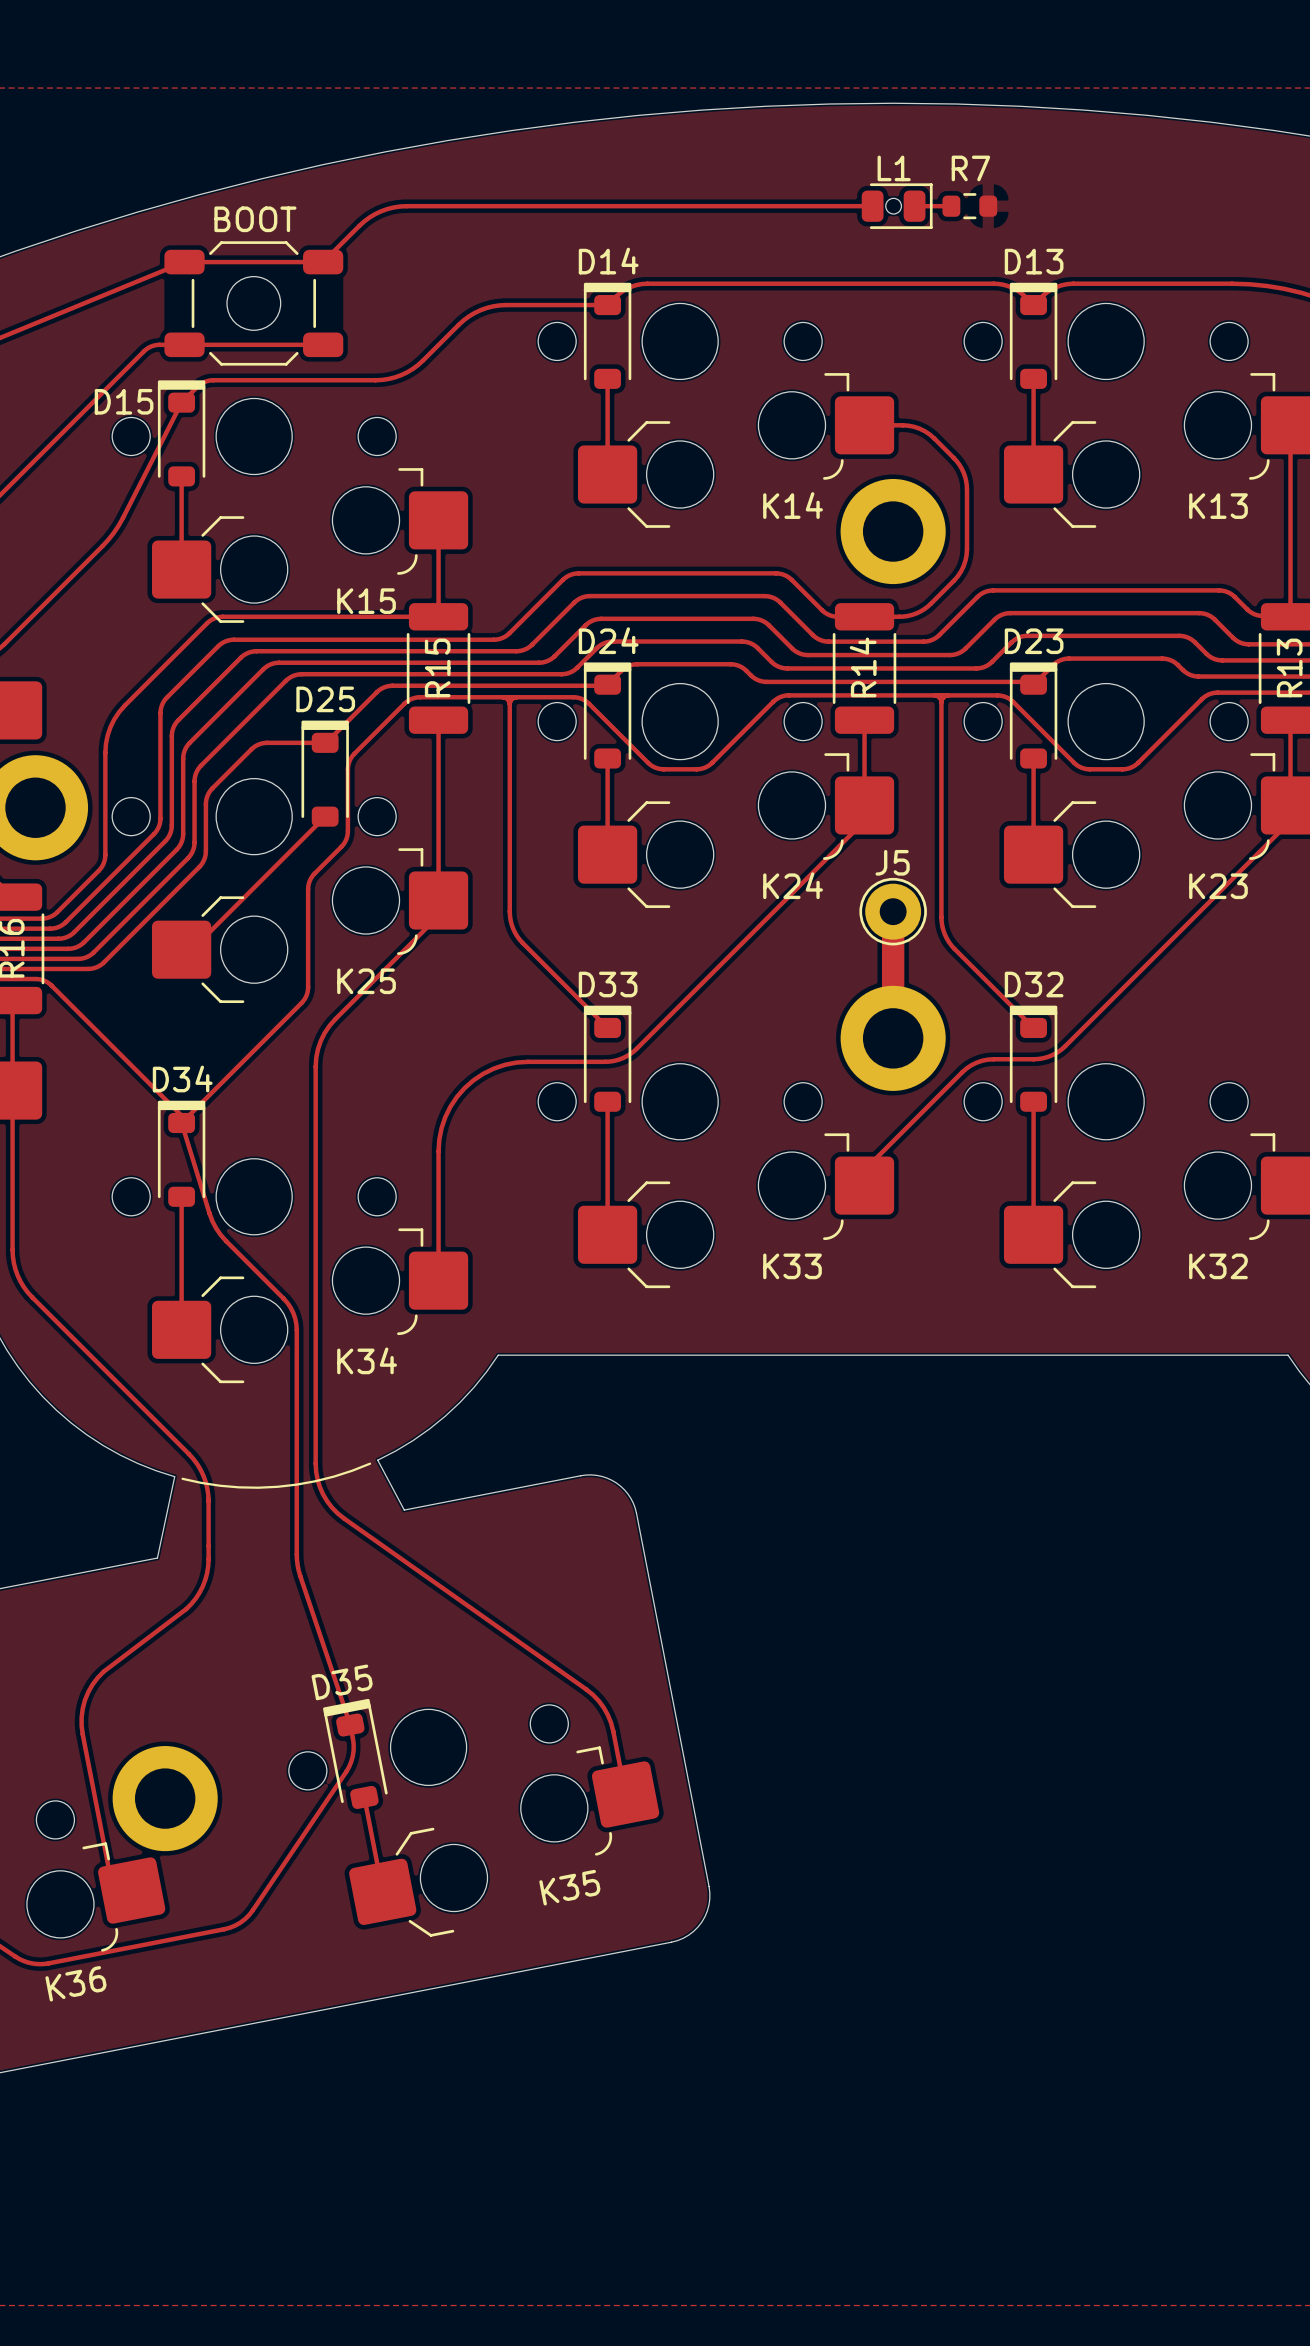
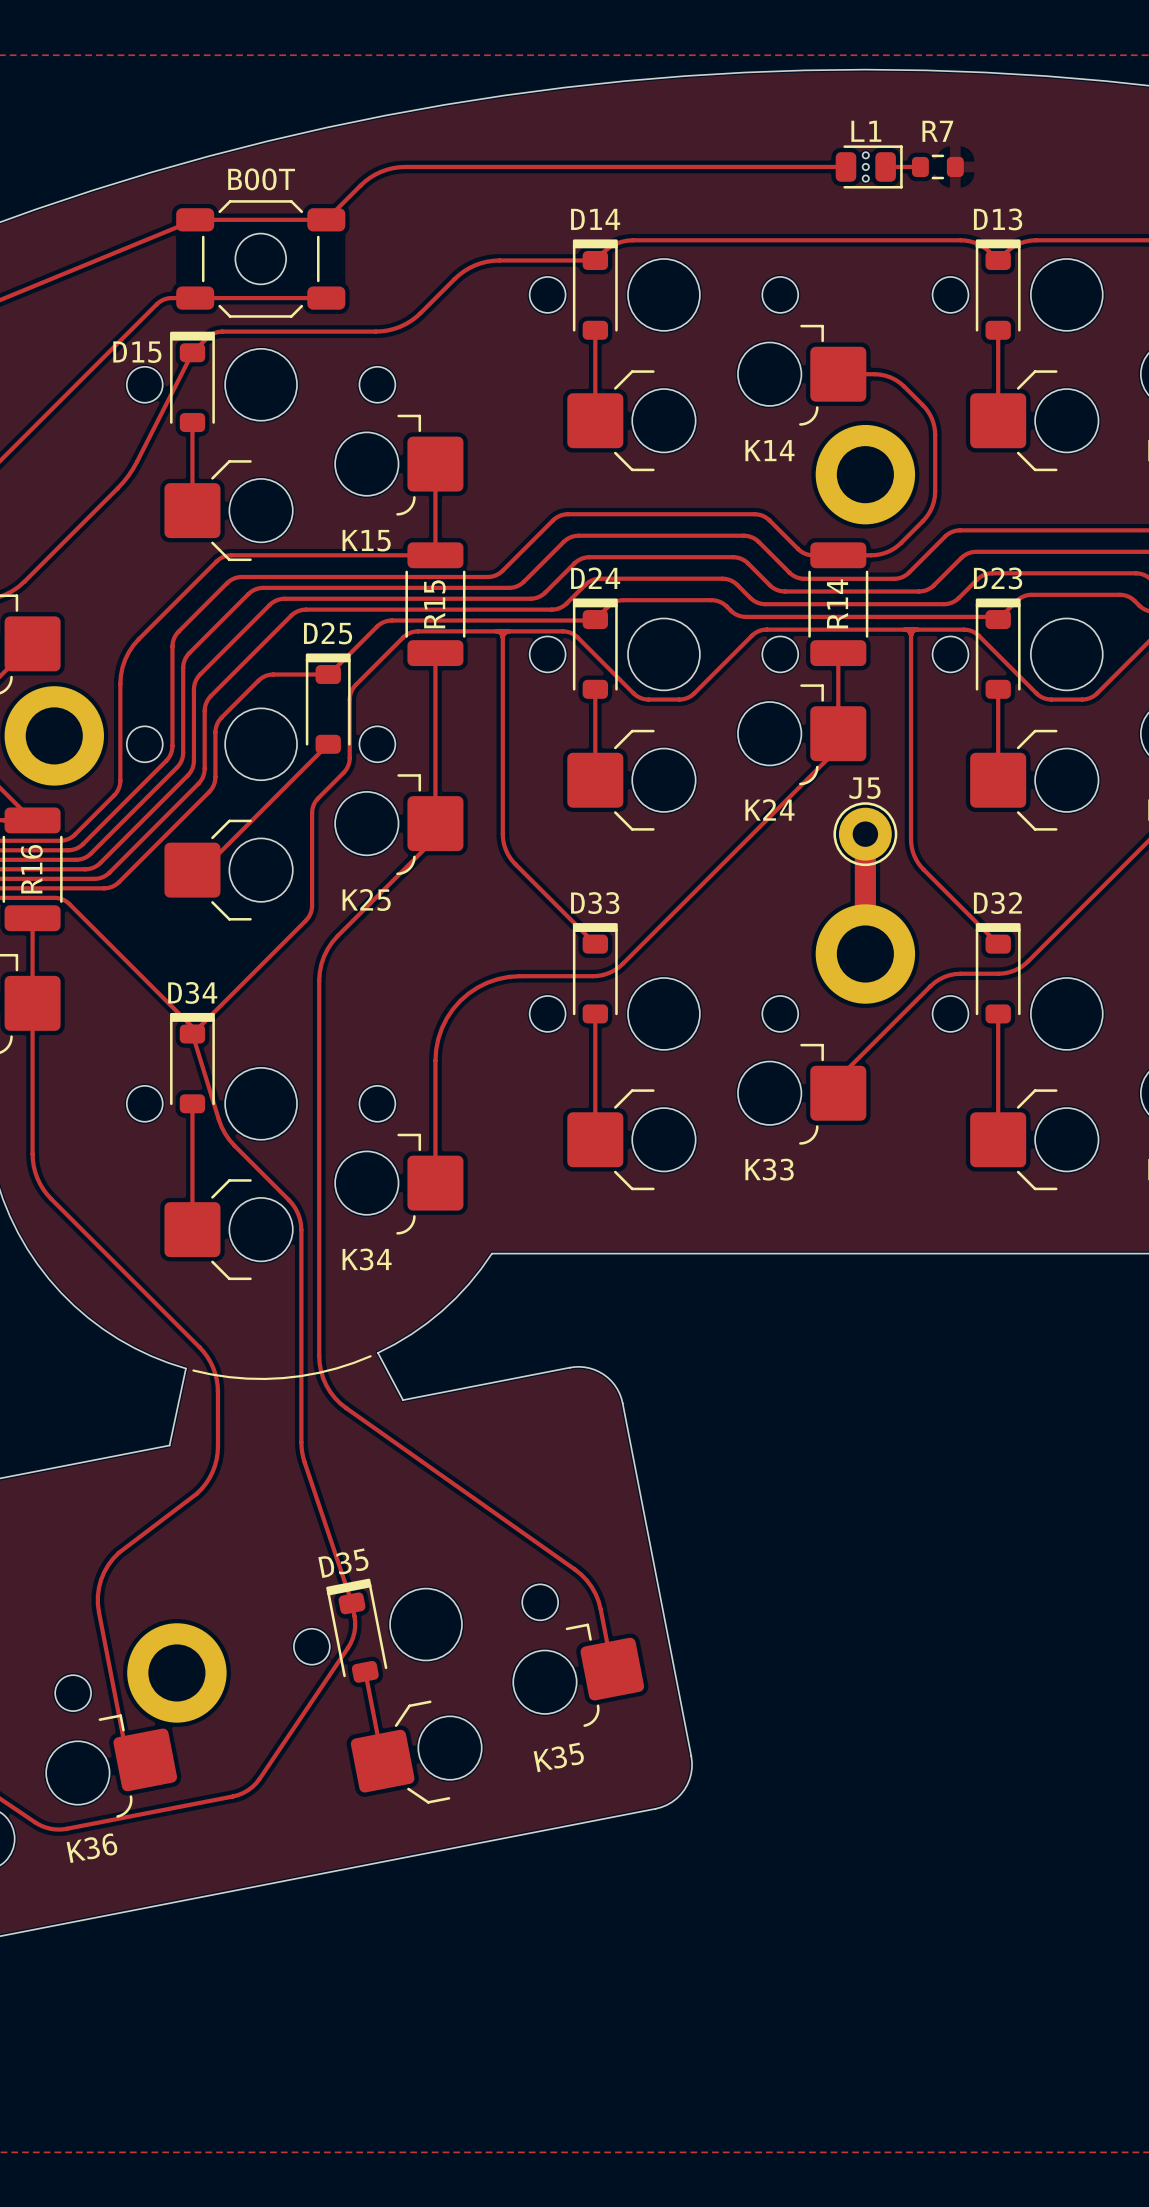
L1 footprint: [861, 183, 933, 229] -> [835, 145, 903, 189]

